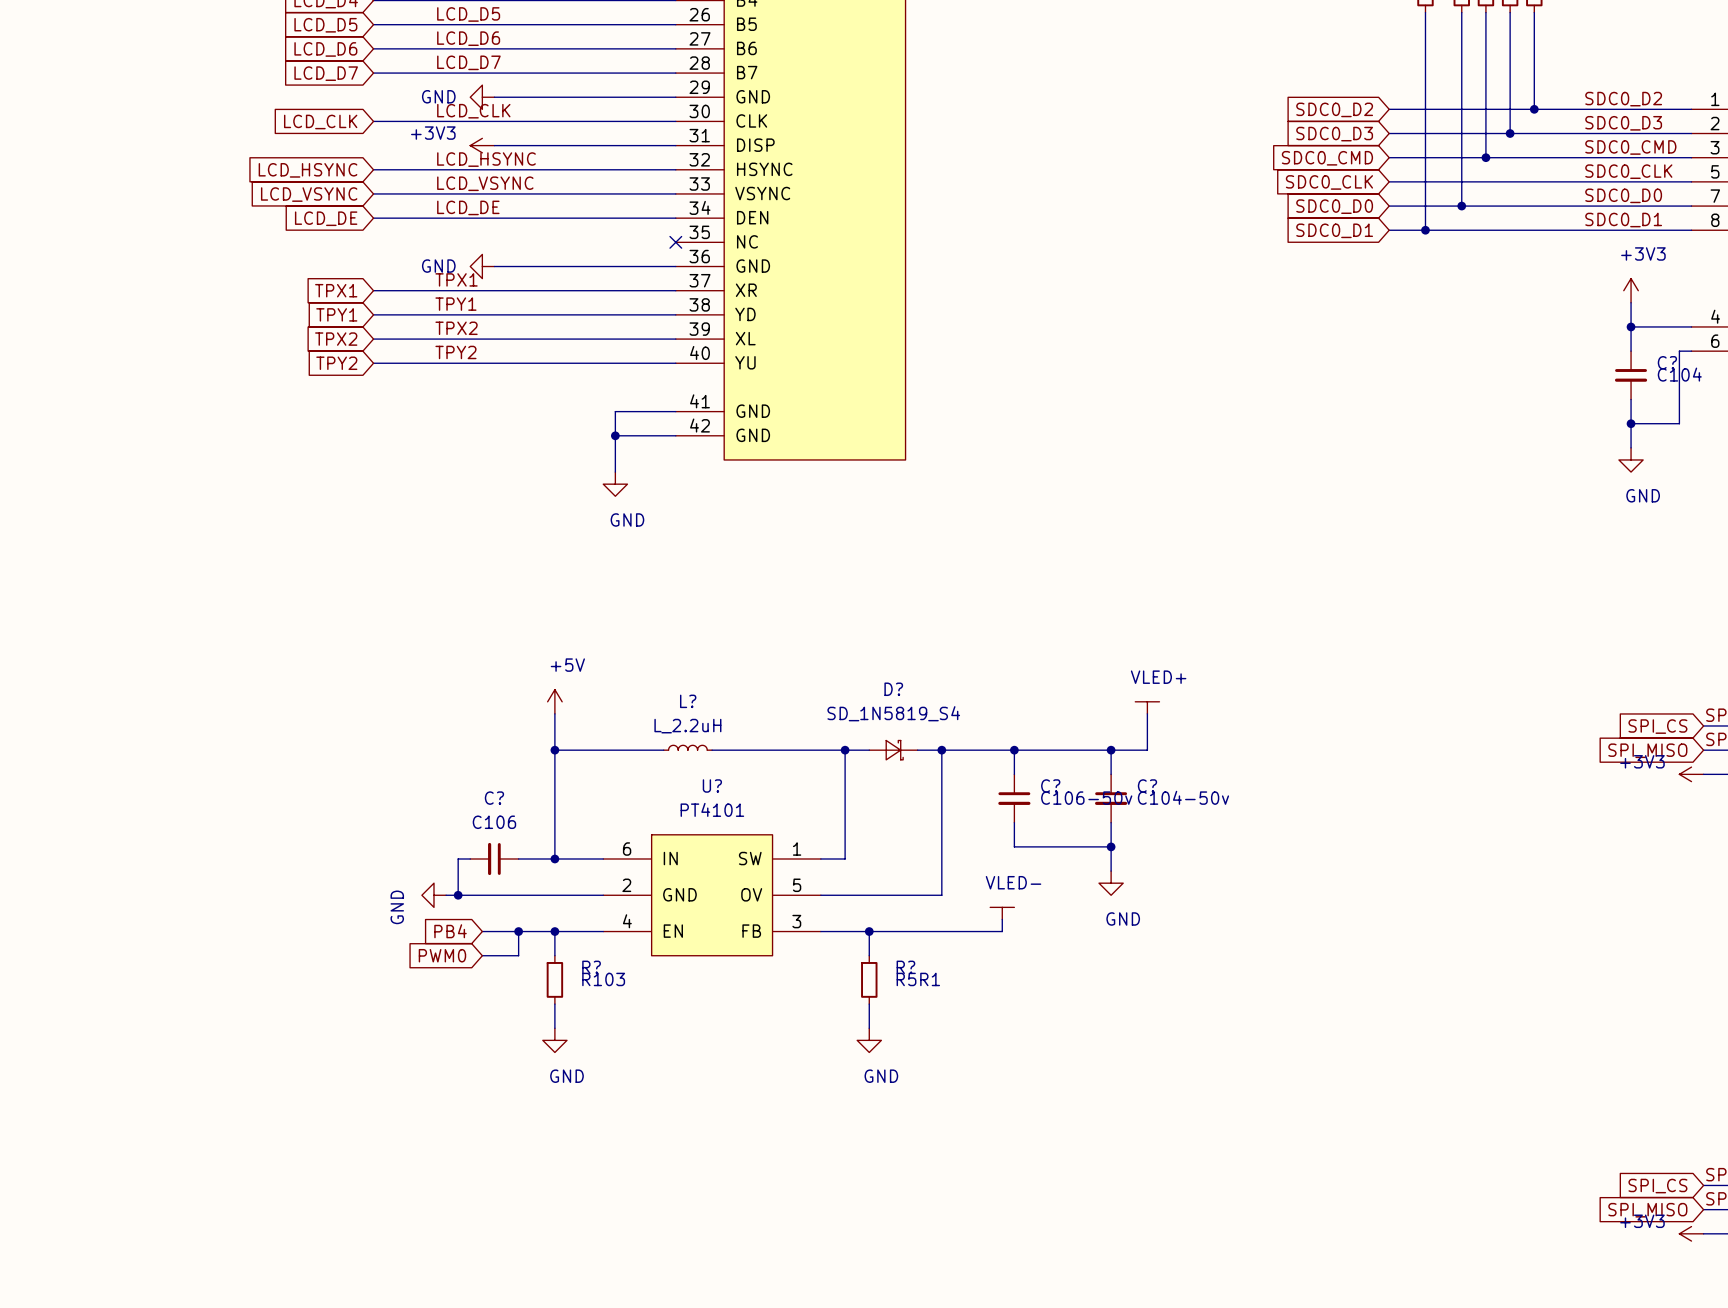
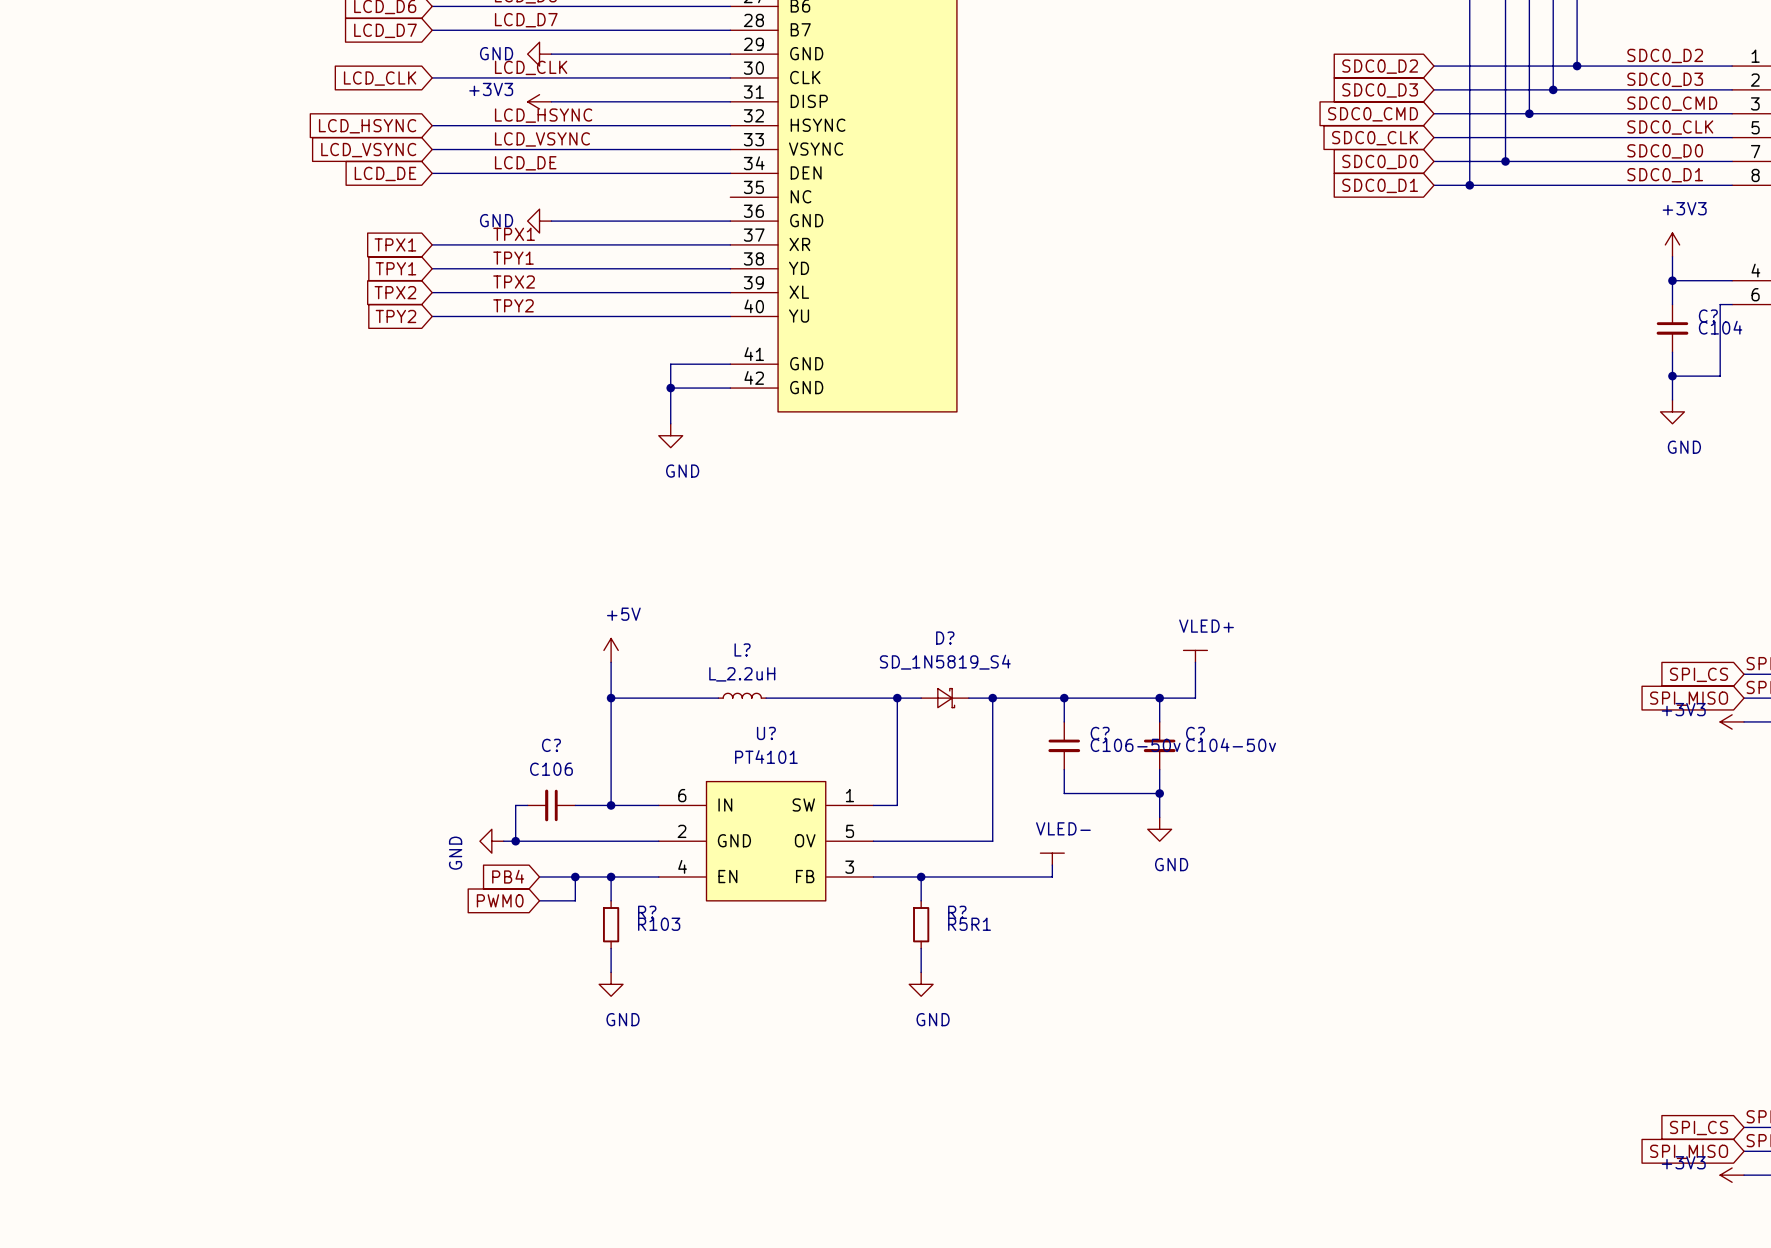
no-connect mark: (675, 242) -> none

